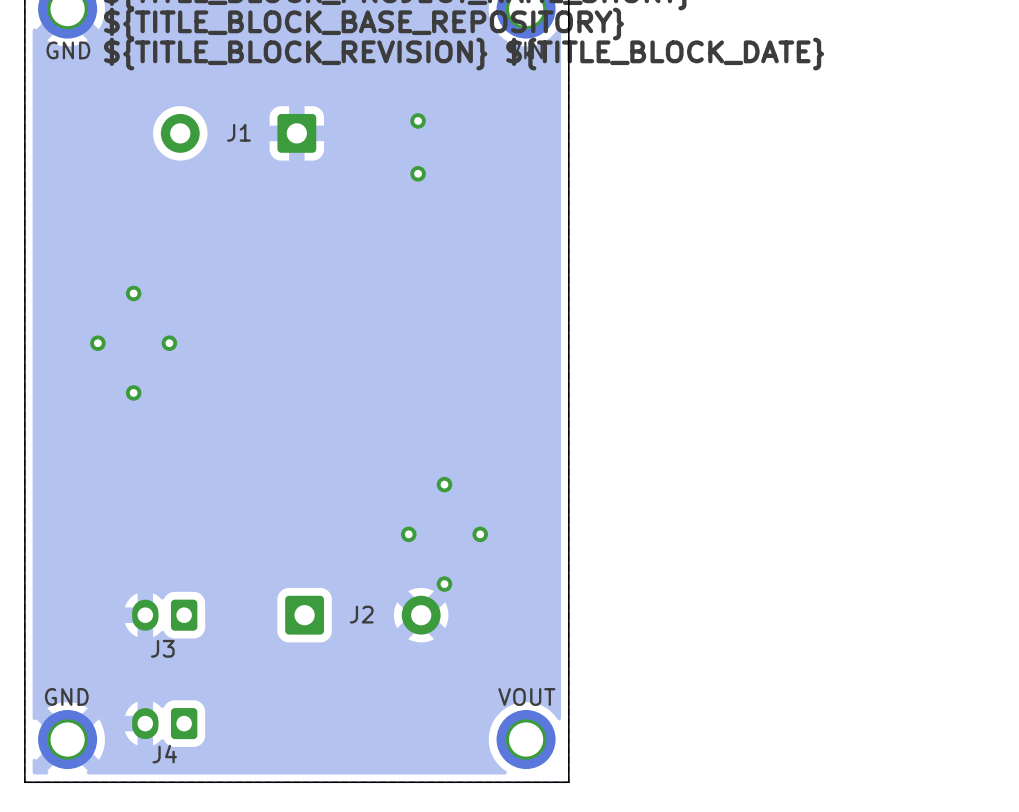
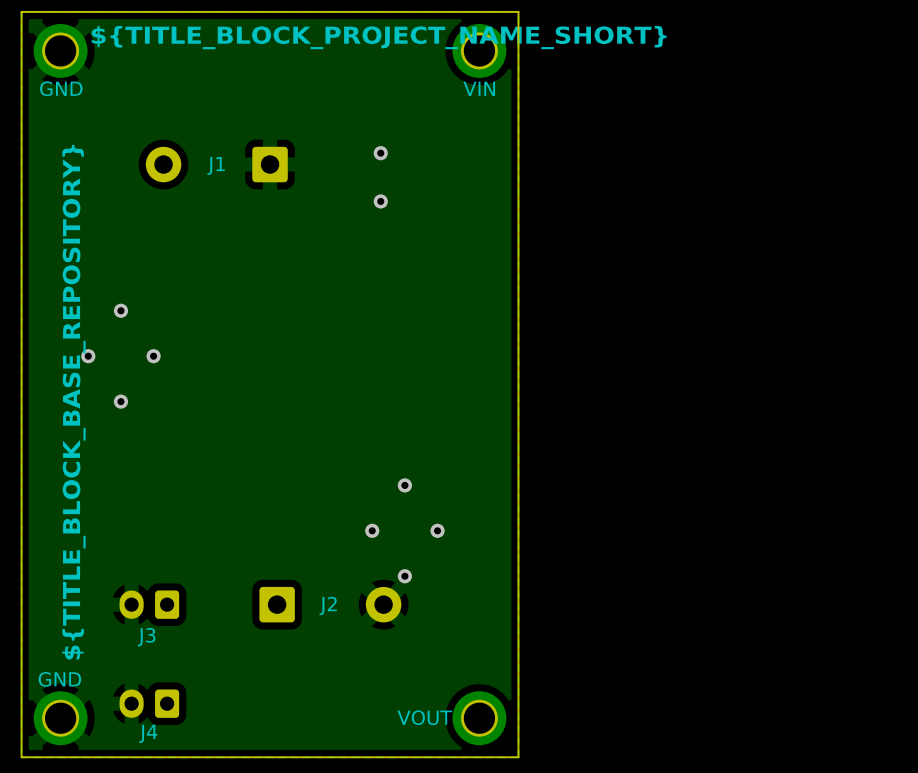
text: ${TITLE_BLOCK_BASE_REPOSITORY} (363, 24) -> none
text: ${TITLE_BLOCK_REVISION} ${TITLE_BLOCK_DATE} (464, 54) -> none
text: none -> ${TITLE_BLOCK_BASE_REPOSITORY} (73, 402)
text position: VOUT (526, 696) -> VOUT (424, 717)

